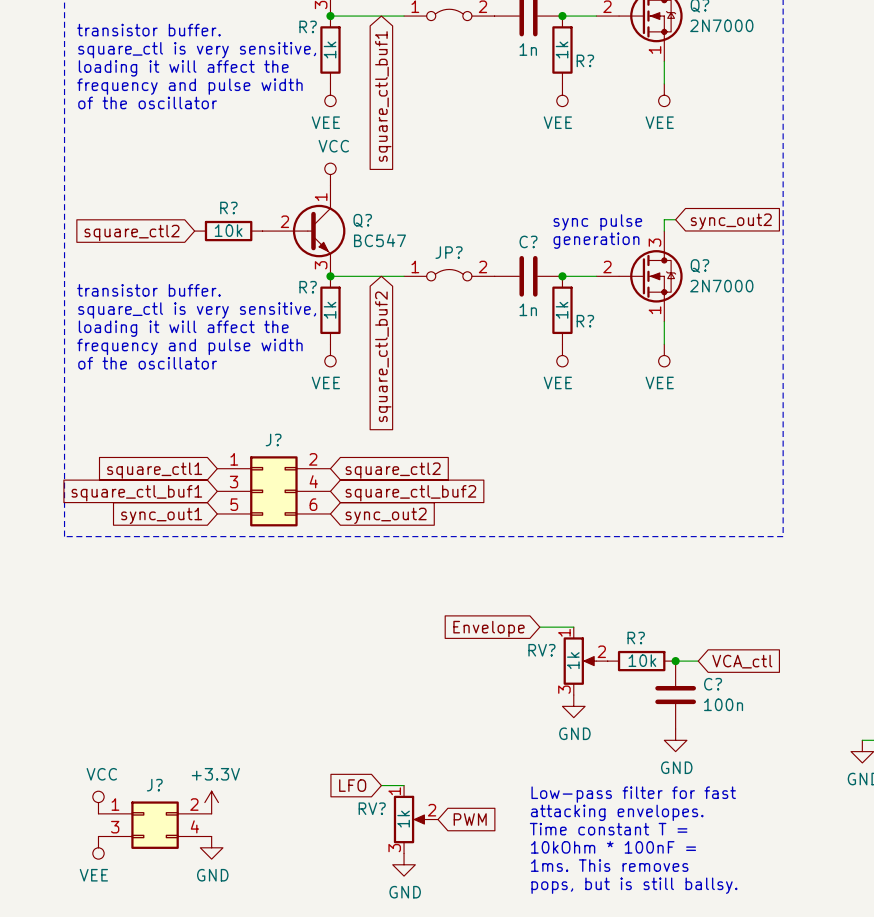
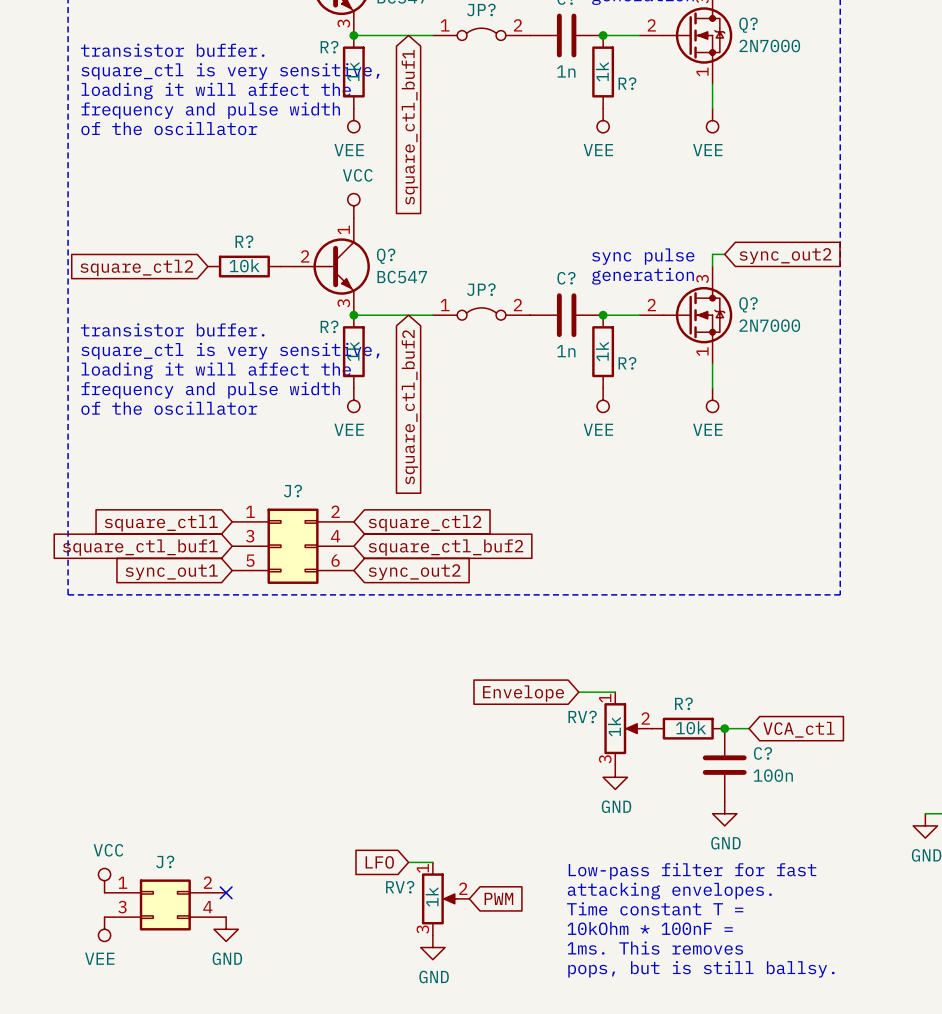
power symbol: +3.3V (211, 802) -> none
no-connect mark: none -> (226, 892)

